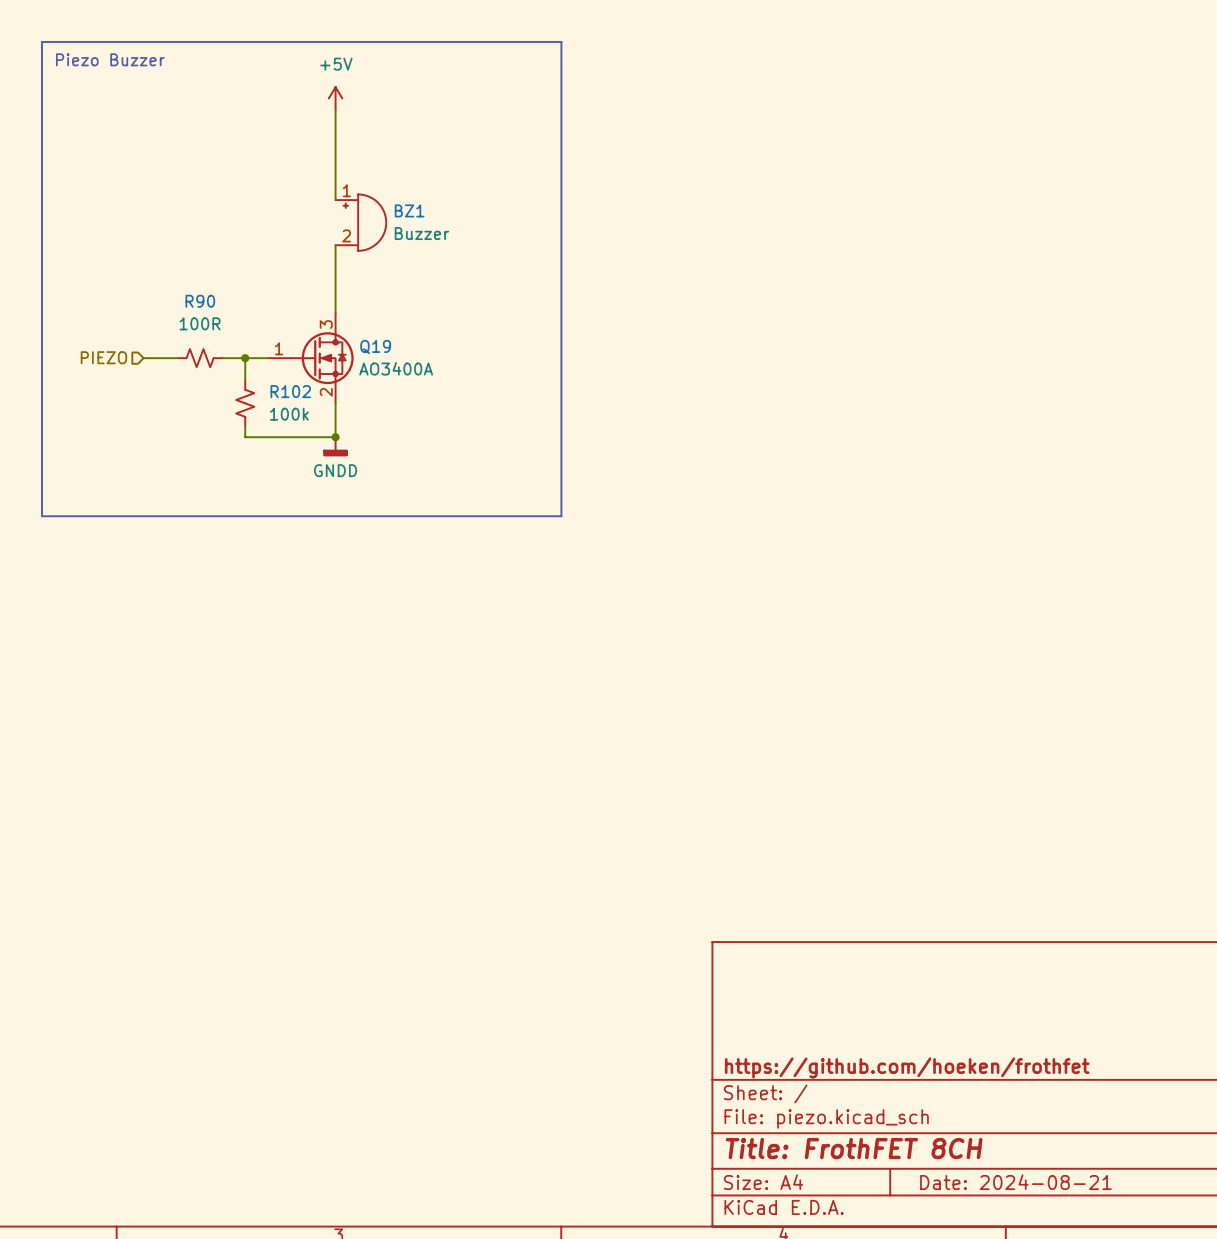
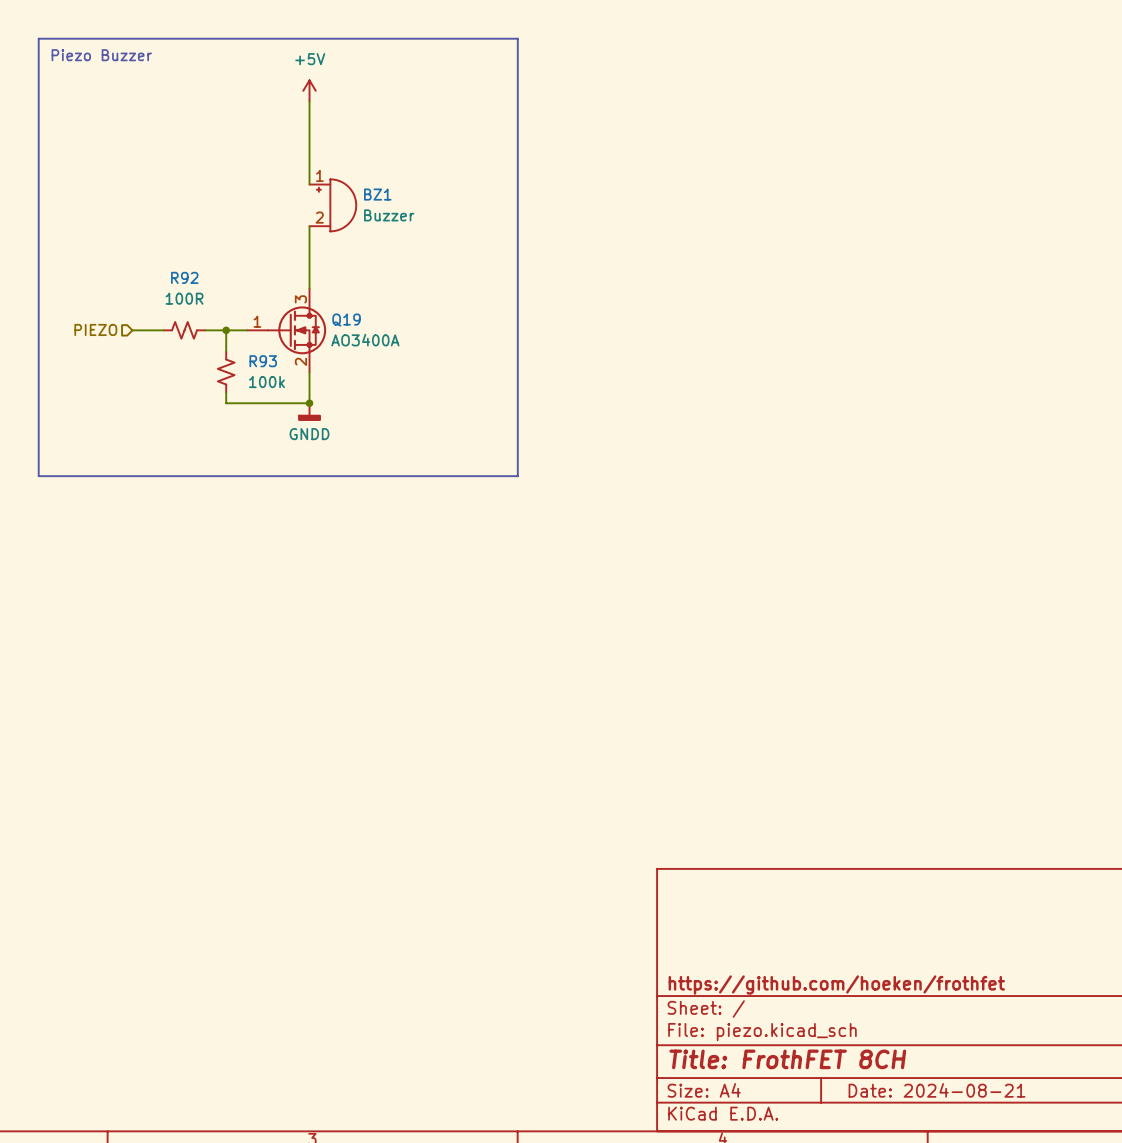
R90 name: R90 (200, 301) -> R92 (184, 277)
R102 name: R102 (290, 391) -> R93 (263, 361)

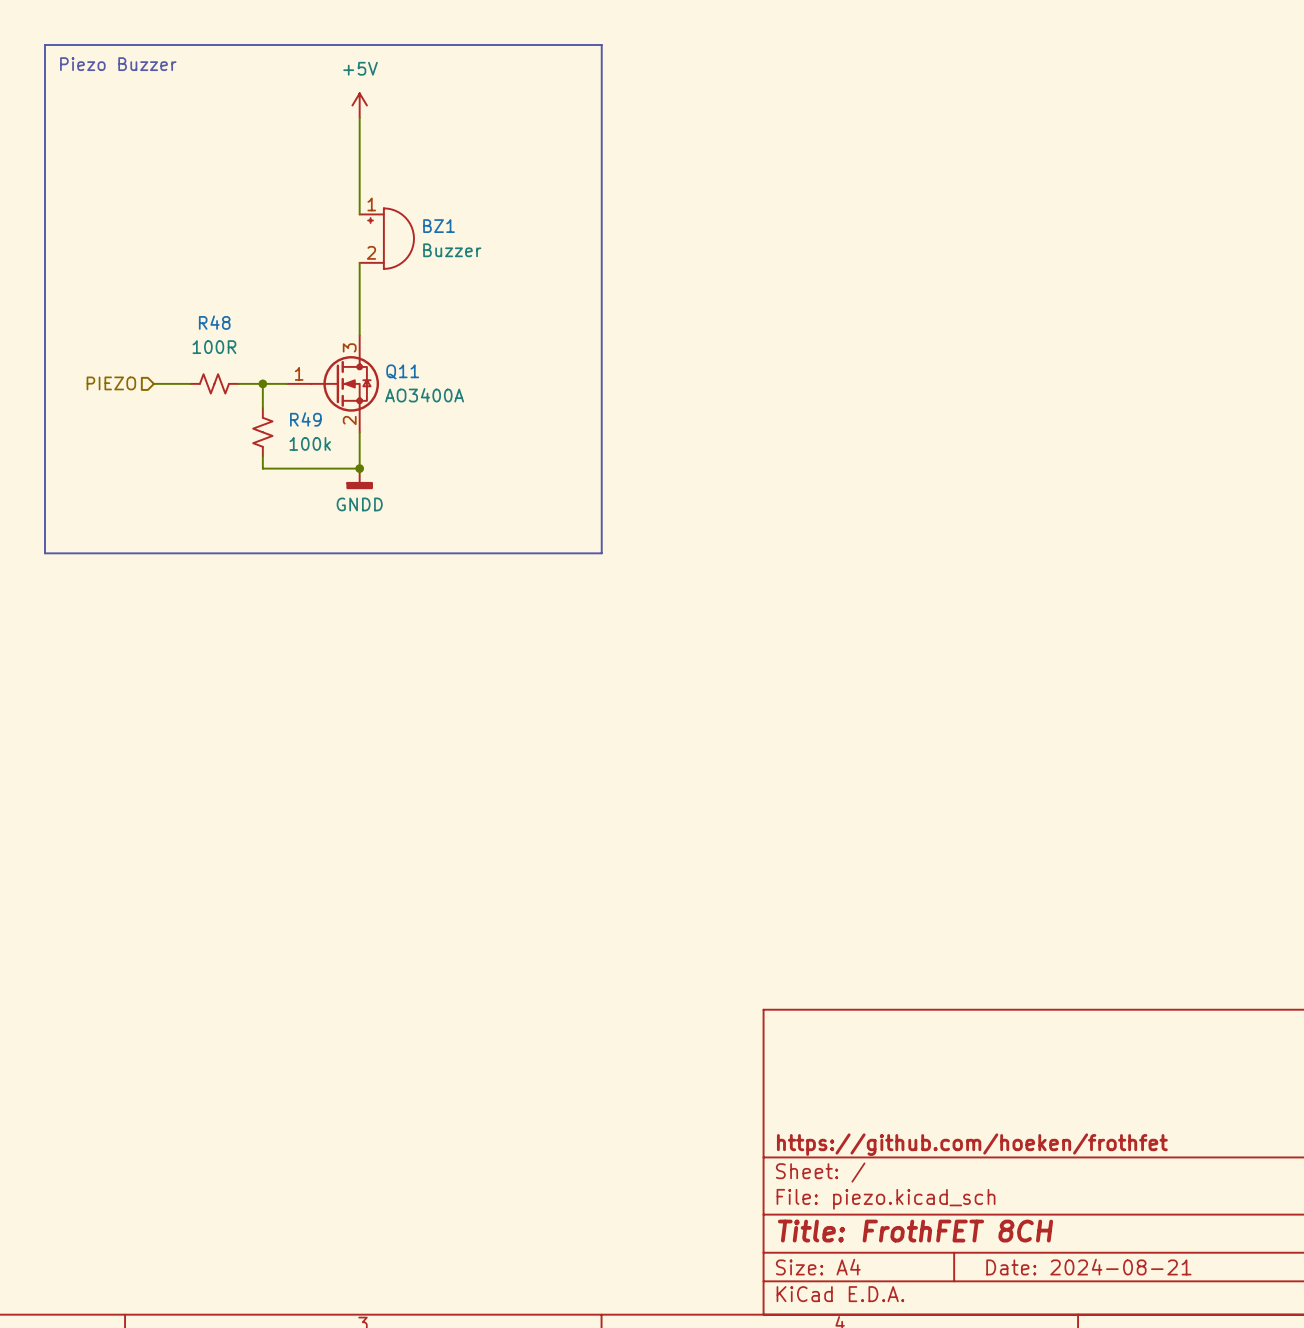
R92 name: R92 (184, 277) -> R48 (214, 322)
Q19 name: Q19 (346, 320) -> Q11 (402, 371)
R93 name: R93 (263, 361) -> R49 (305, 419)

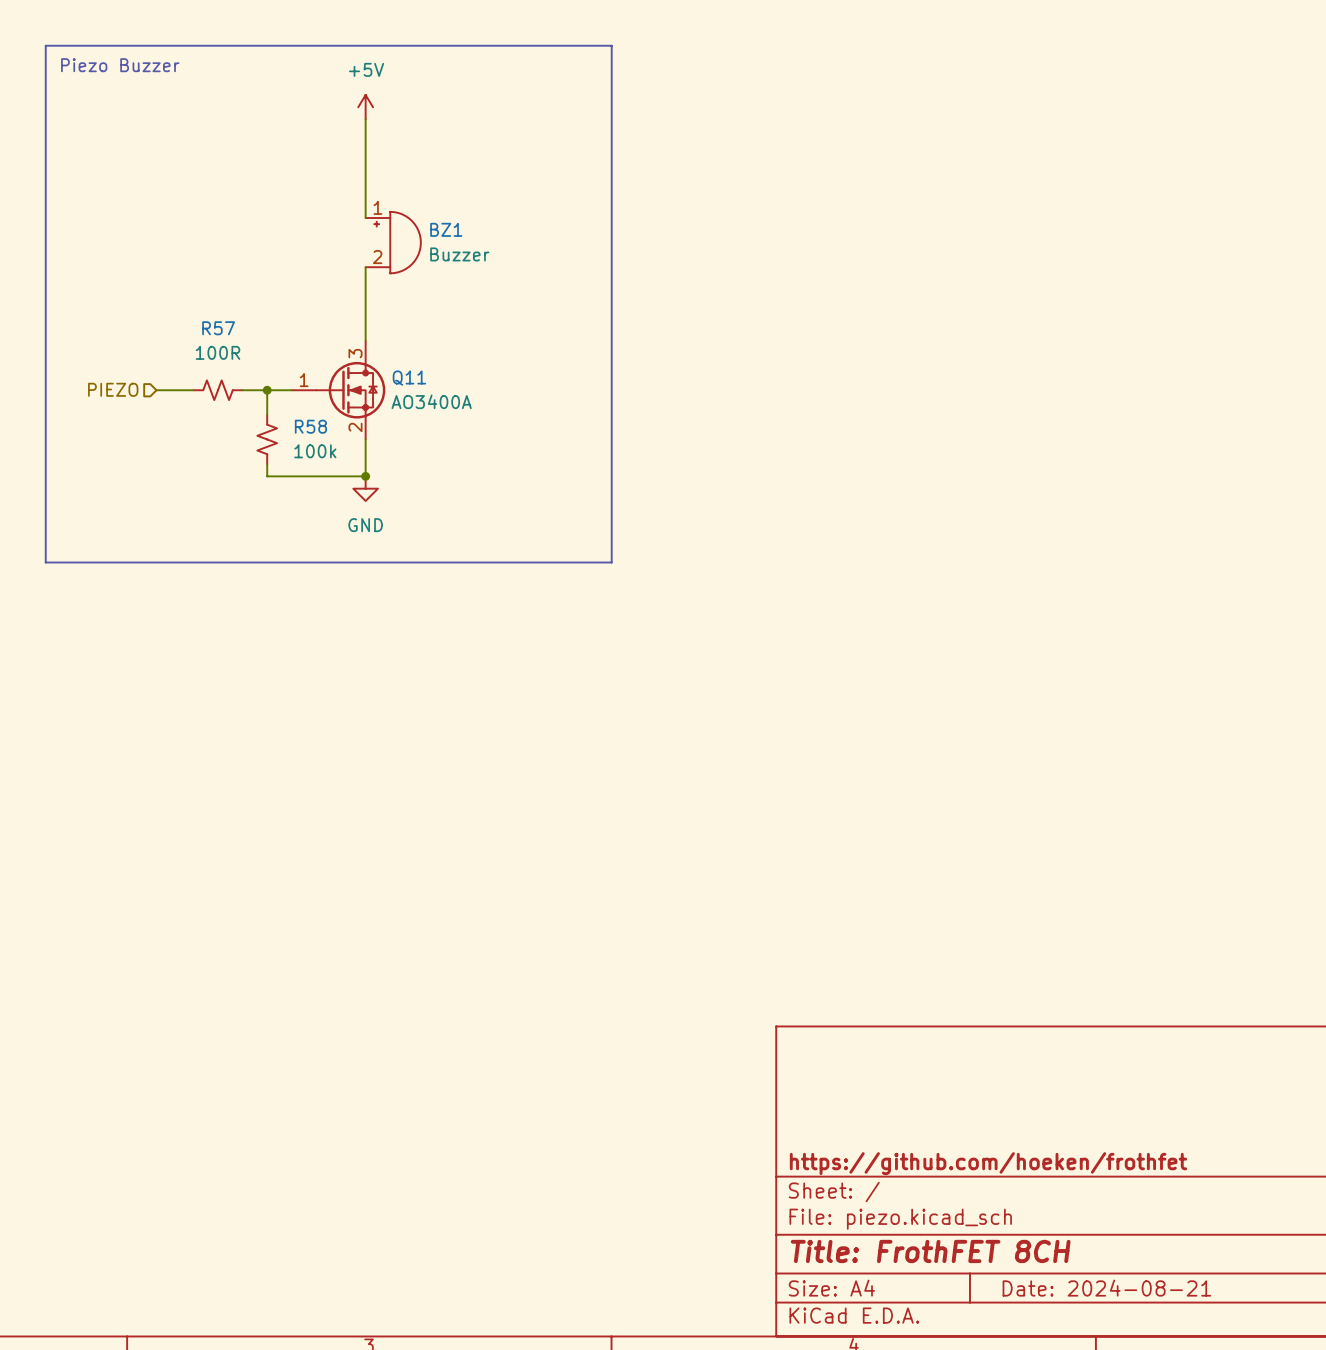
R48 name: R48 (214, 322) -> R57 (218, 328)
R49 name: R49 (305, 419) -> R58 (310, 426)
power symbol: GNDD (359, 478) -> GND (365, 488)

